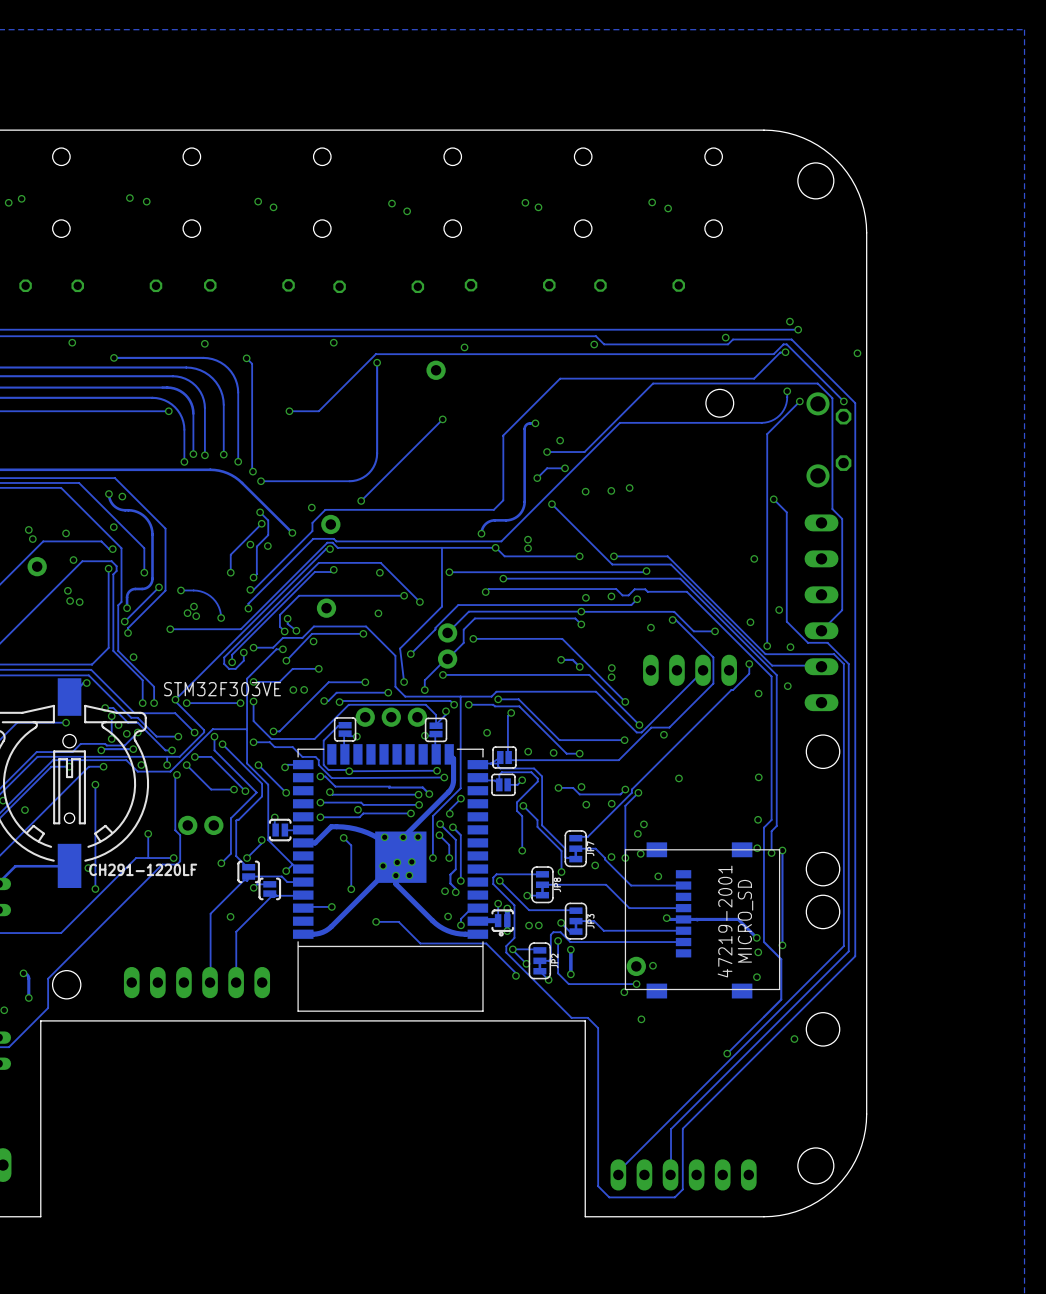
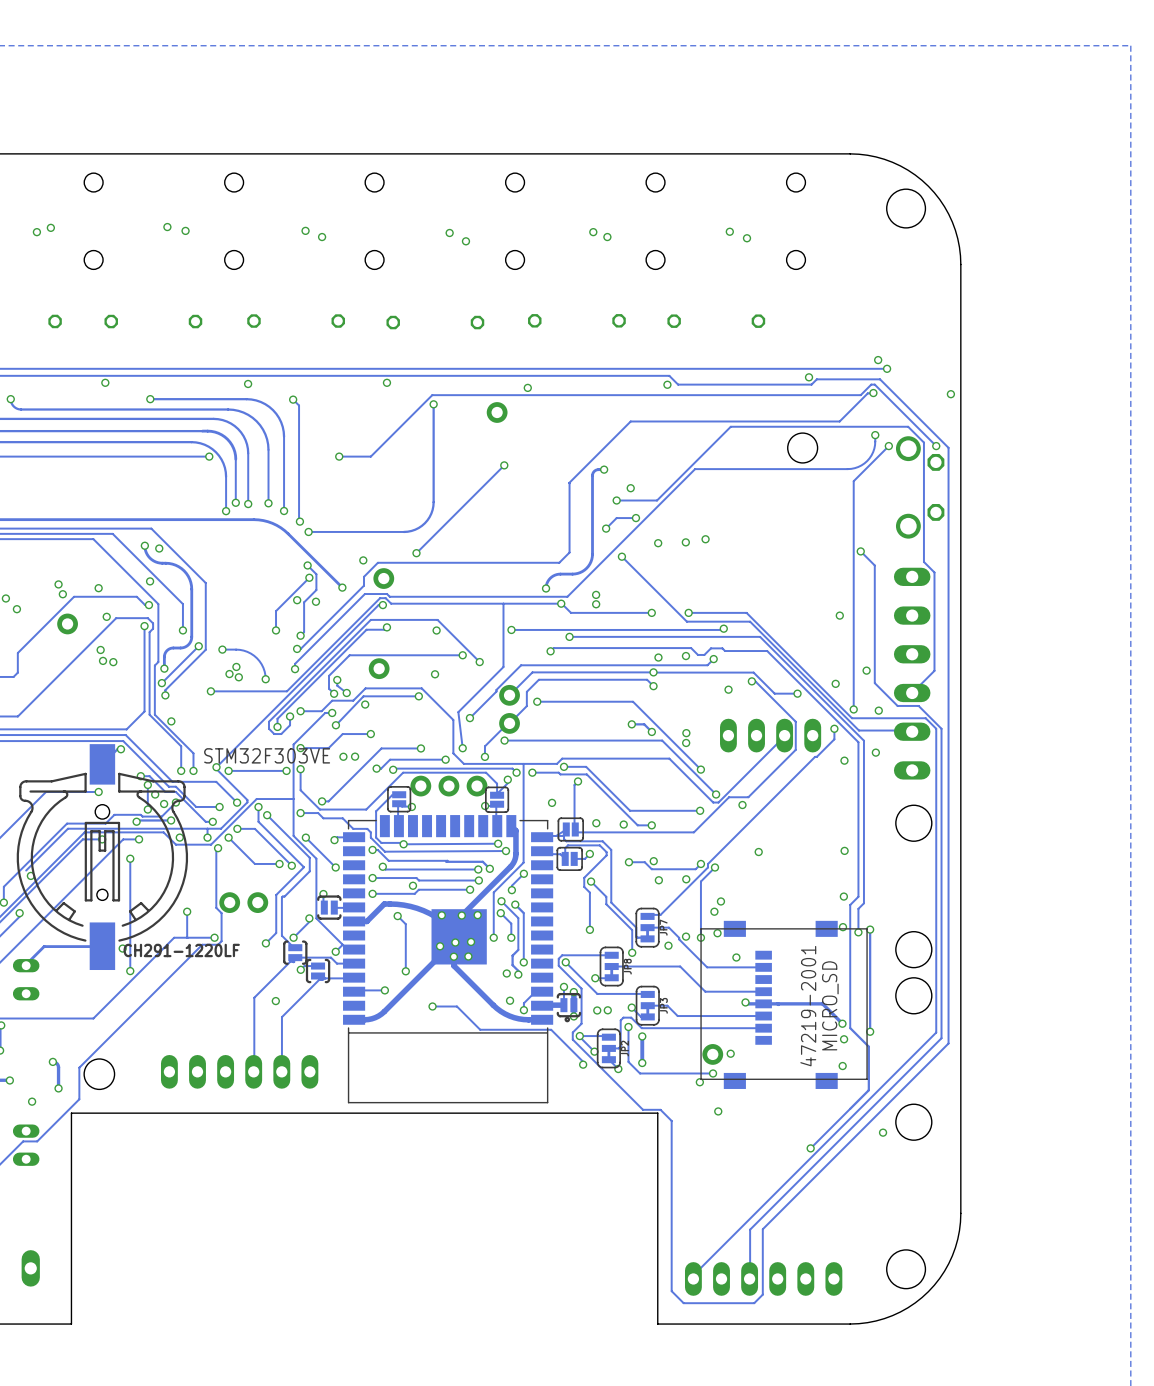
via: (24, 810) -> none

